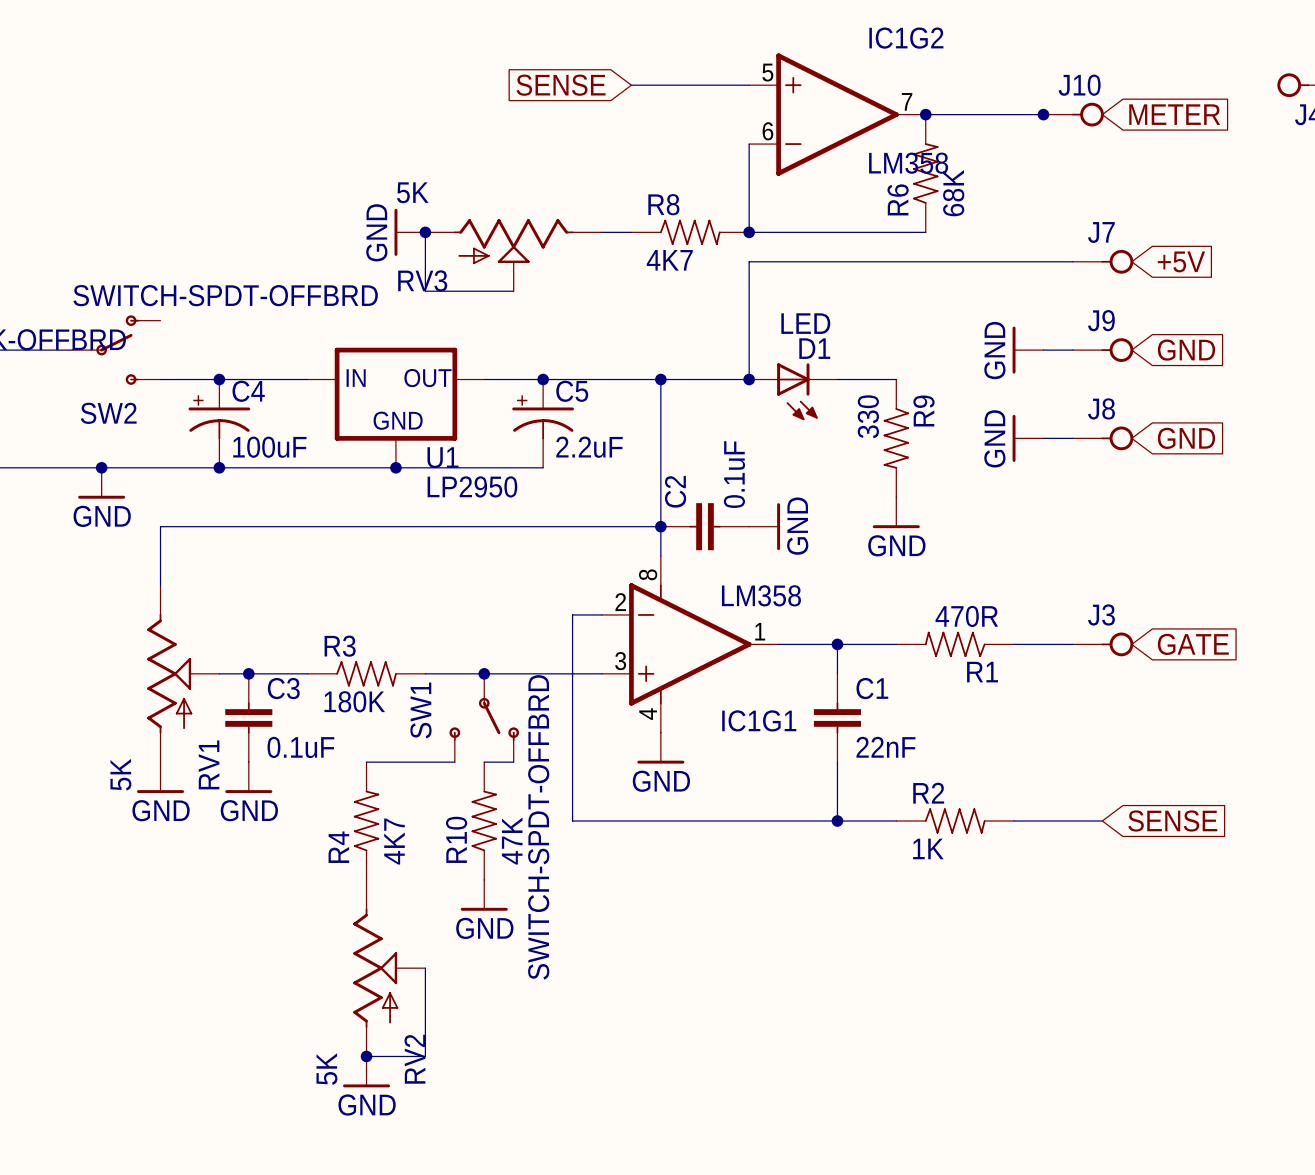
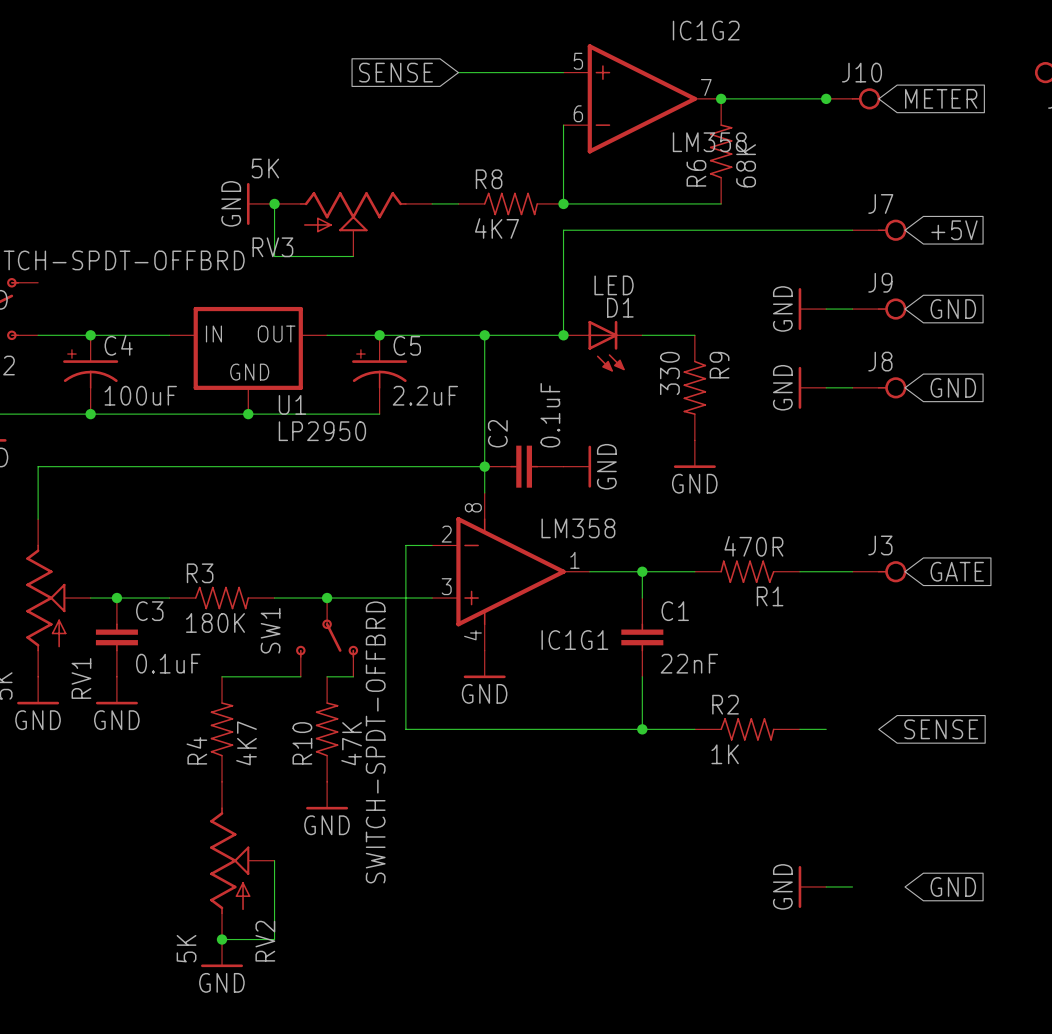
wire: (1043, 821) (1102, 821) -> none
power symbol: none -> GND (812, 886)
wire: none -> (826, 886) (852, 886)
global label: none -> GND (953, 886)

